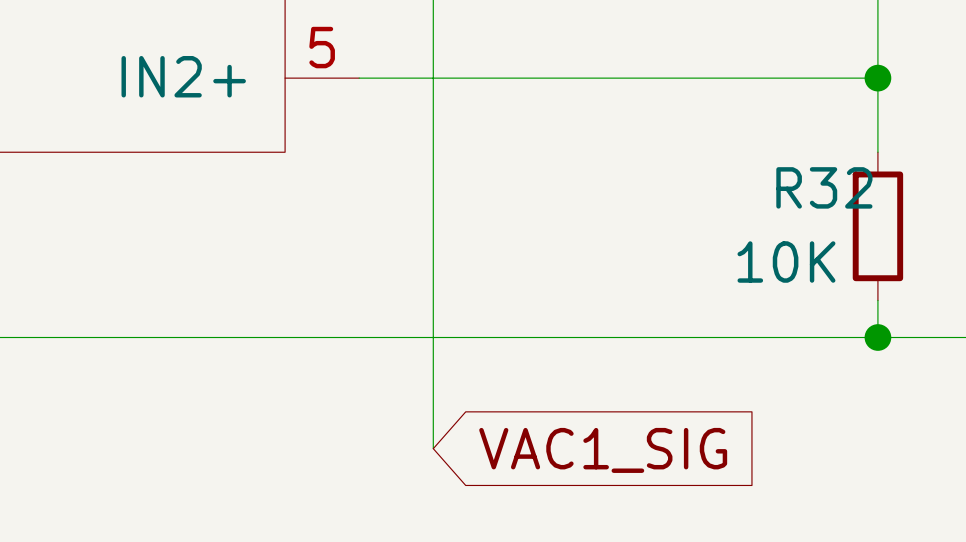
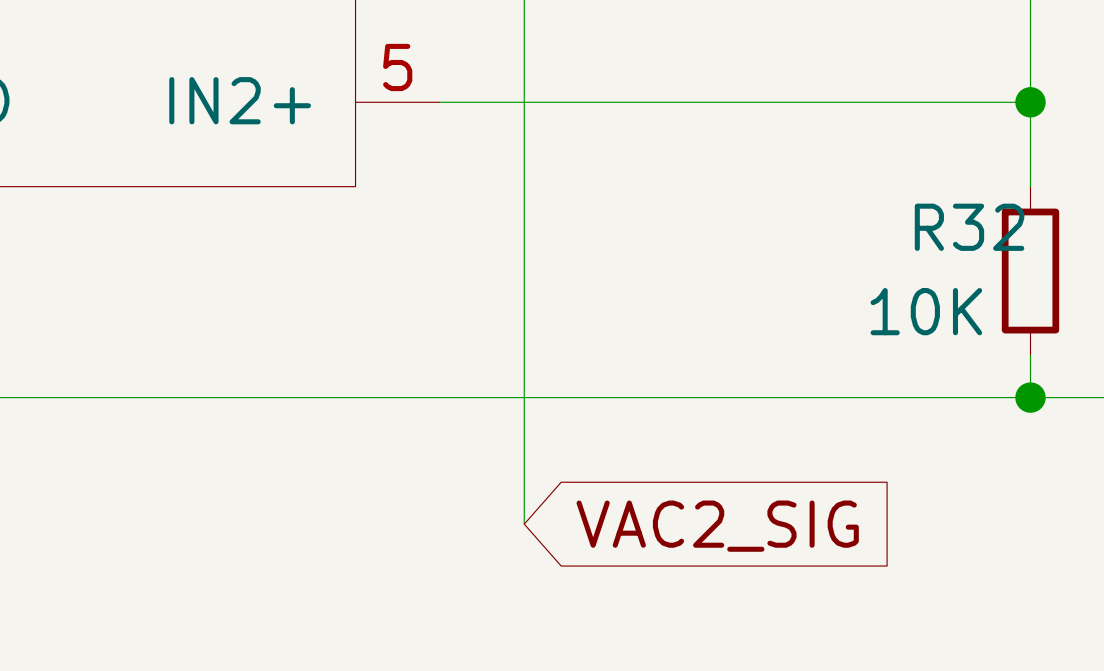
global label: VAC1_SIG (603, 450) -> VAC2_SIG (717, 526)

